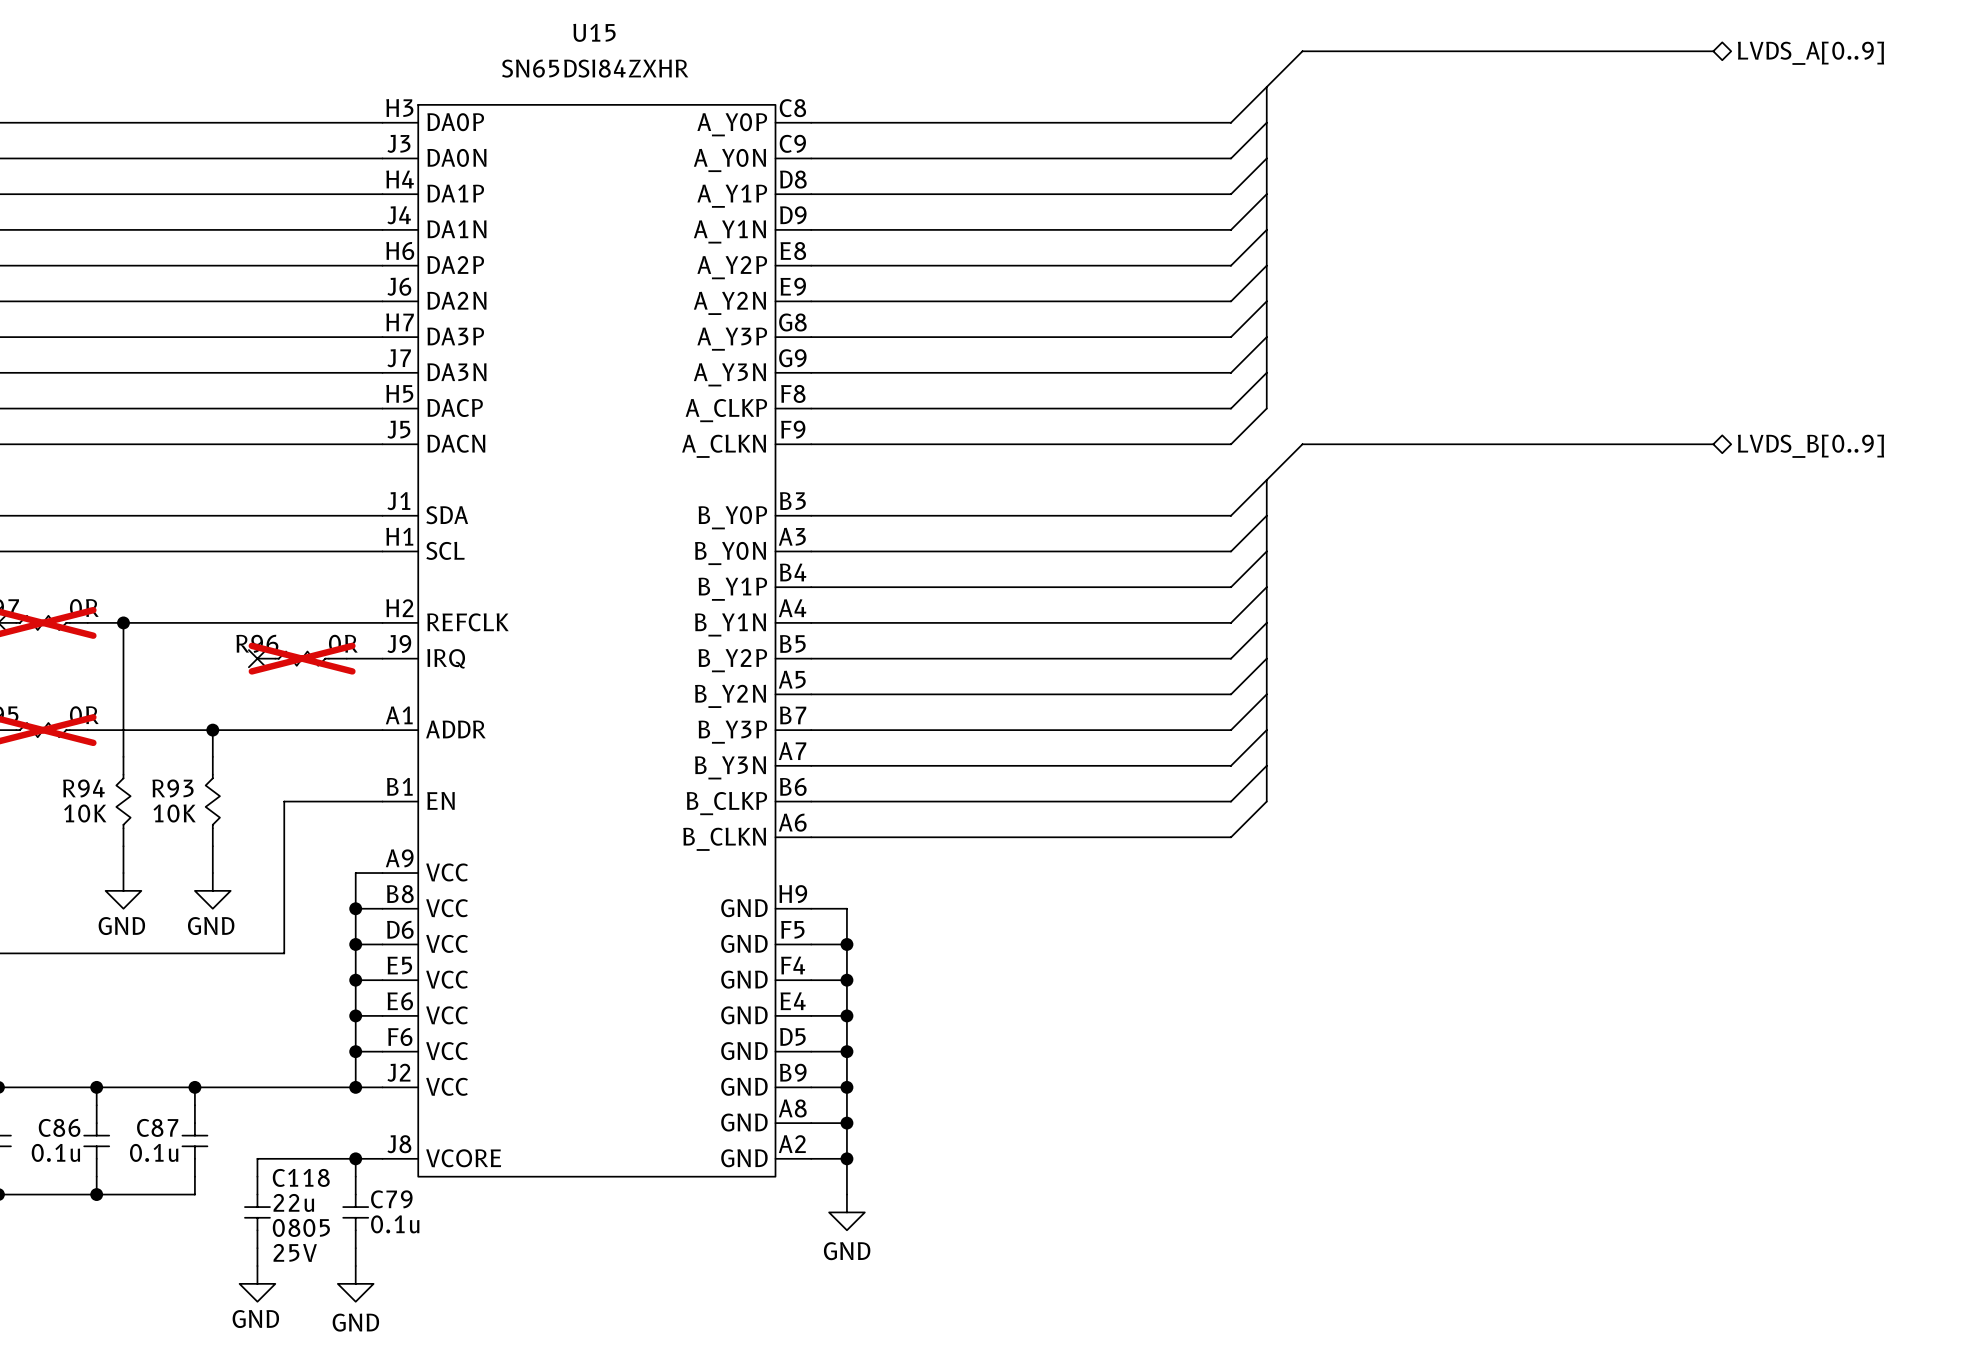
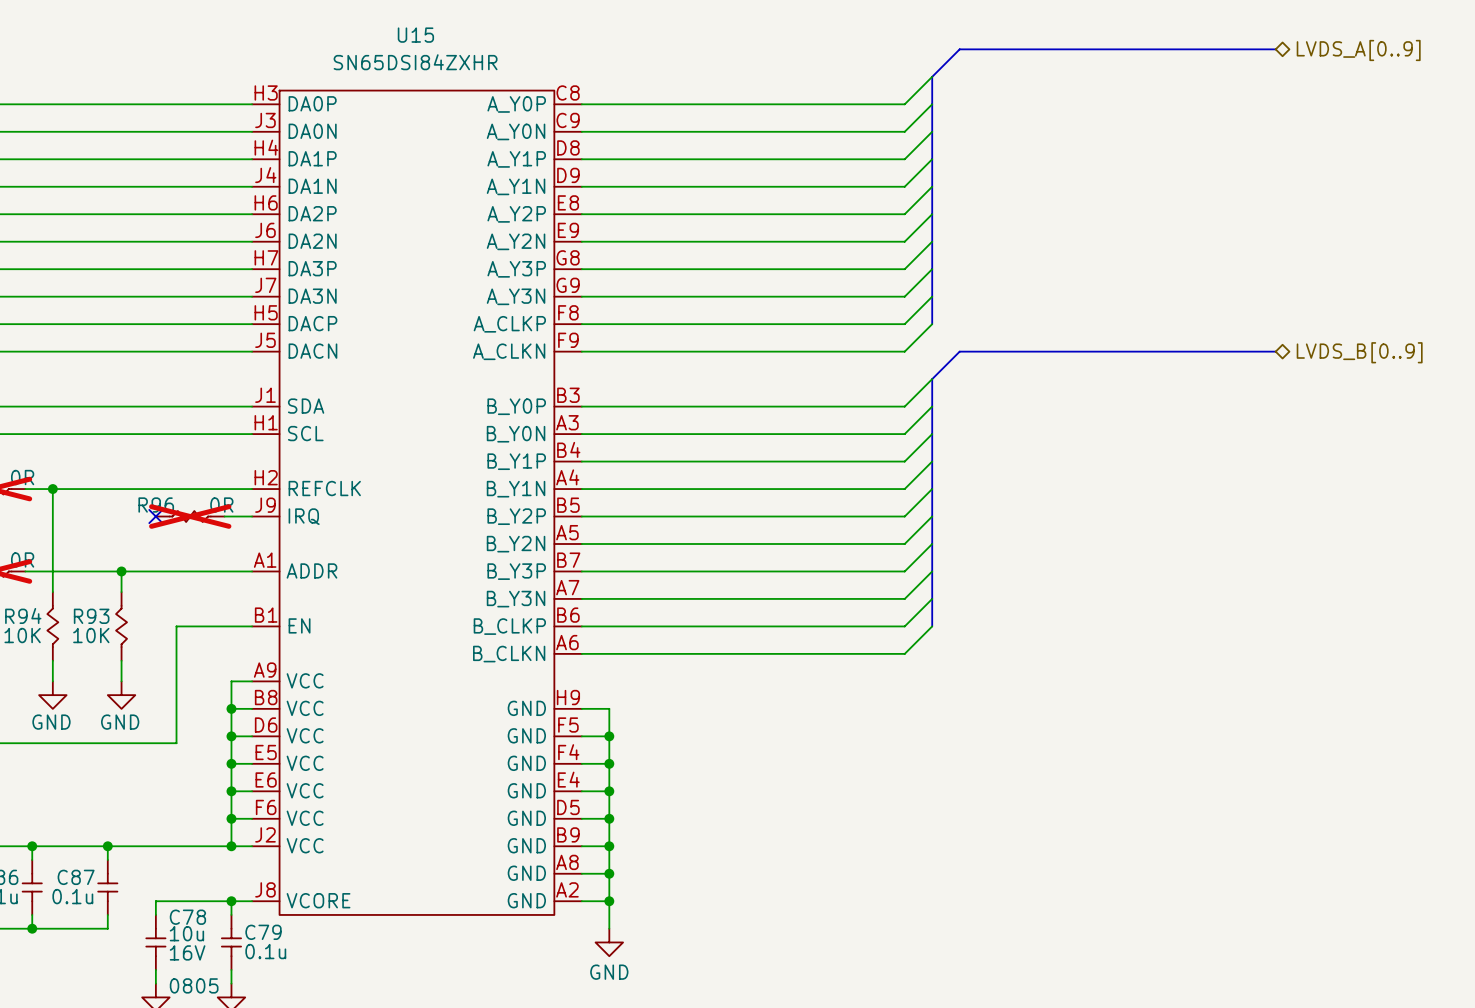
C118 name: C118 (301, 1177) -> C78 (187, 917)
C118 value: 22u (293, 1202) -> 10u (186, 933)
C118 text position: 0805 (301, 1227) -> 0805 (194, 985)
C118 text: 25V (295, 1252) -> 16V (187, 952)

